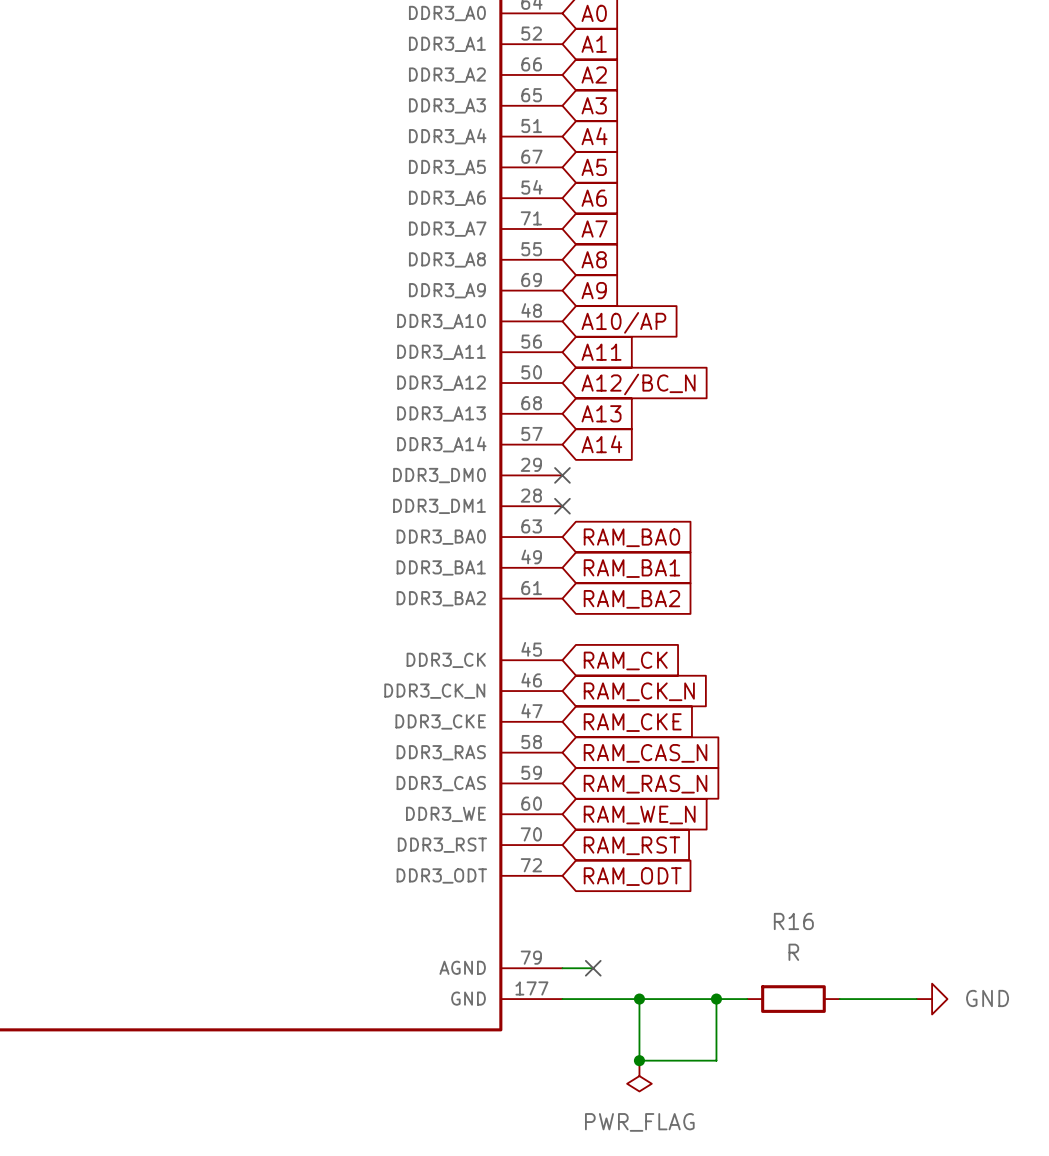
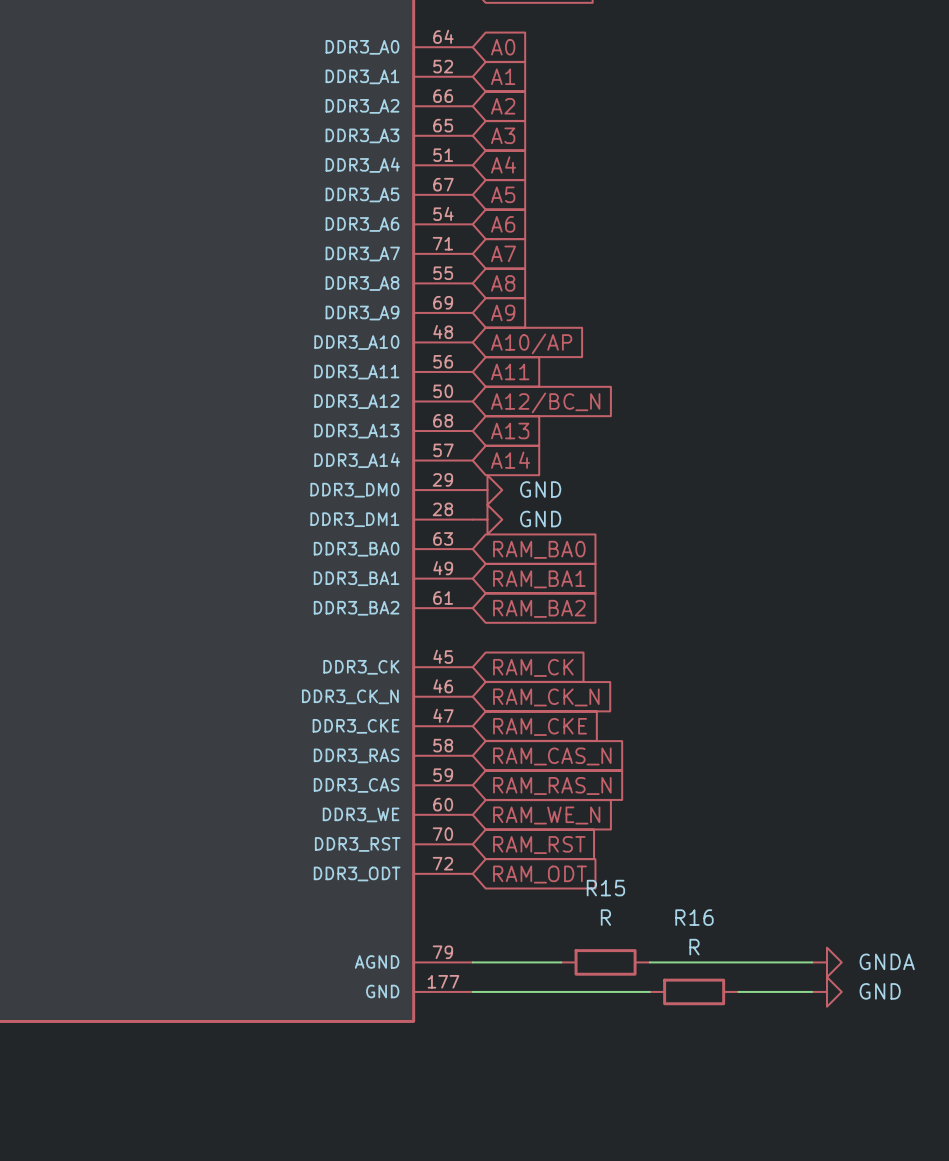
no-connect mark: (562, 475) -> none
power symbol: none -> GND (487, 490)
no-connect mark: (562, 506) -> none
power symbol: none -> GND (487, 519)
wire: none -> (502, 962) (561, 962)
no-connect mark: (593, 968) -> none
R15: none -> R (605, 962)
wire: none -> (649, 962) (812, 962)
power symbol: none -> GNDA (826, 962)
wire: (639, 999) (639, 1060) (716, 1060) (716, 999) -> none
junction: (639, 999) -> none
junction: (716, 999) -> none
junction: (639, 1060) -> none
power symbol: PWR_FLAG (639, 1076) -> none

